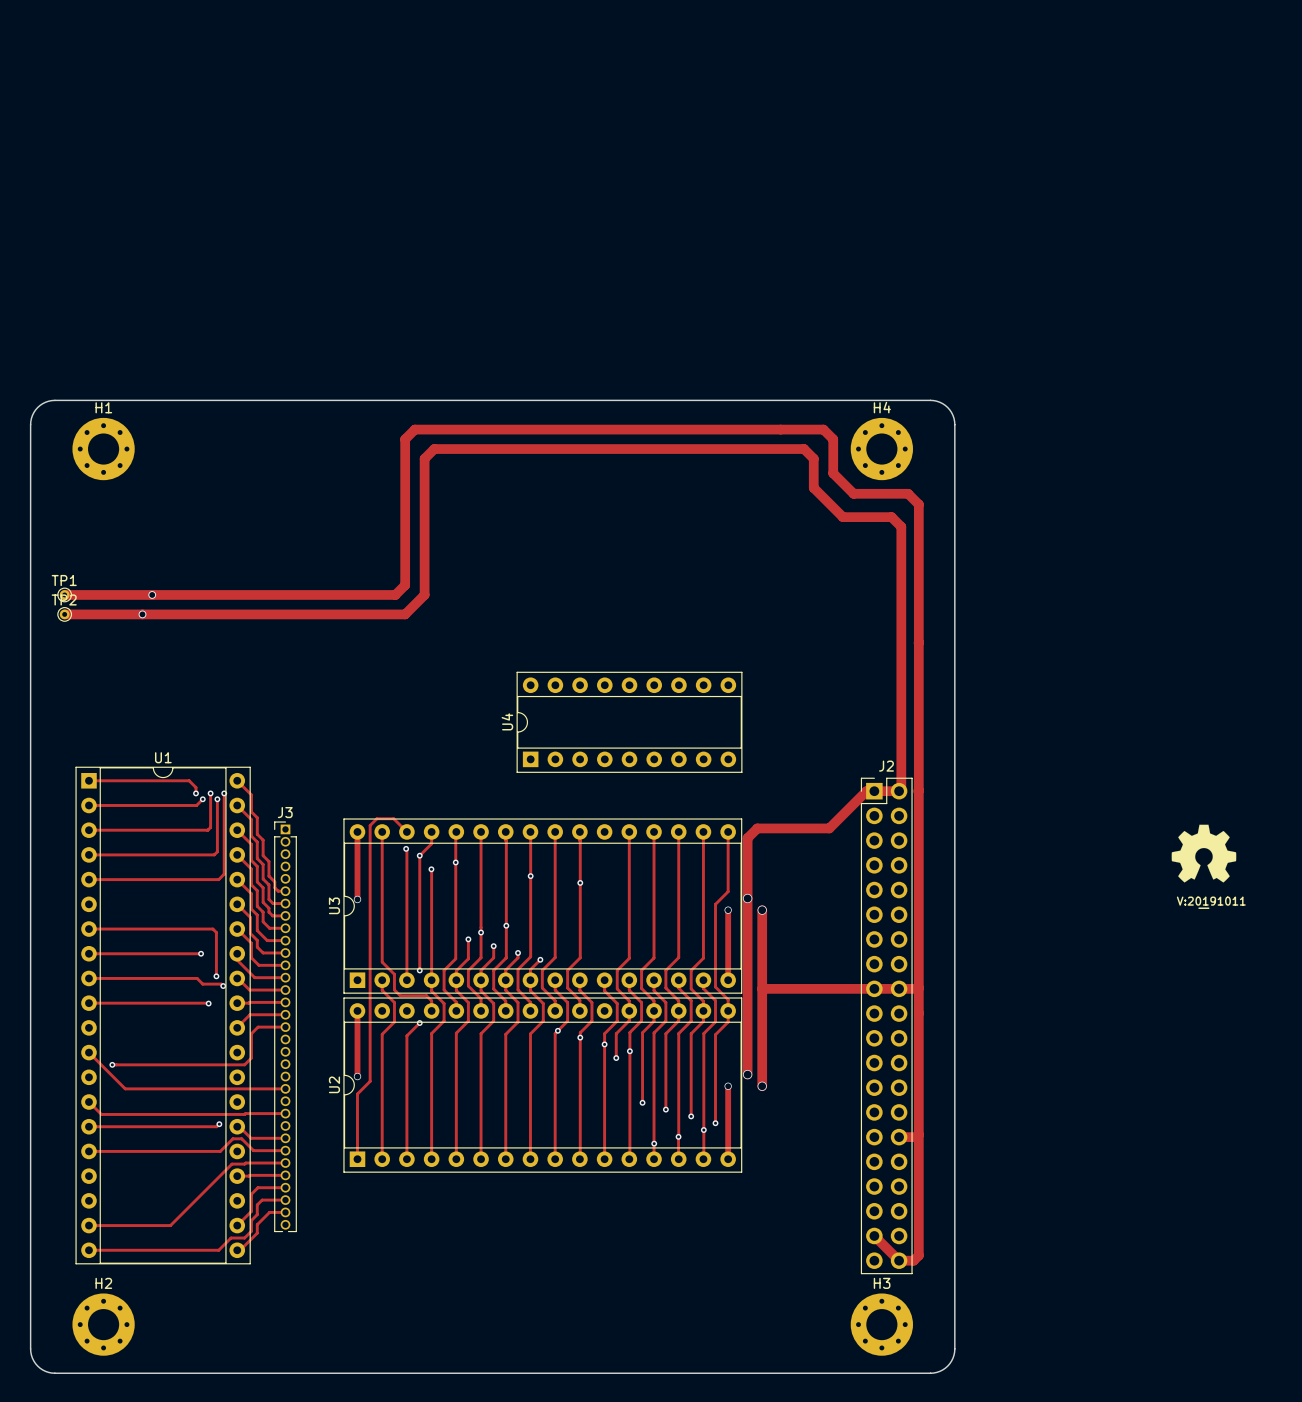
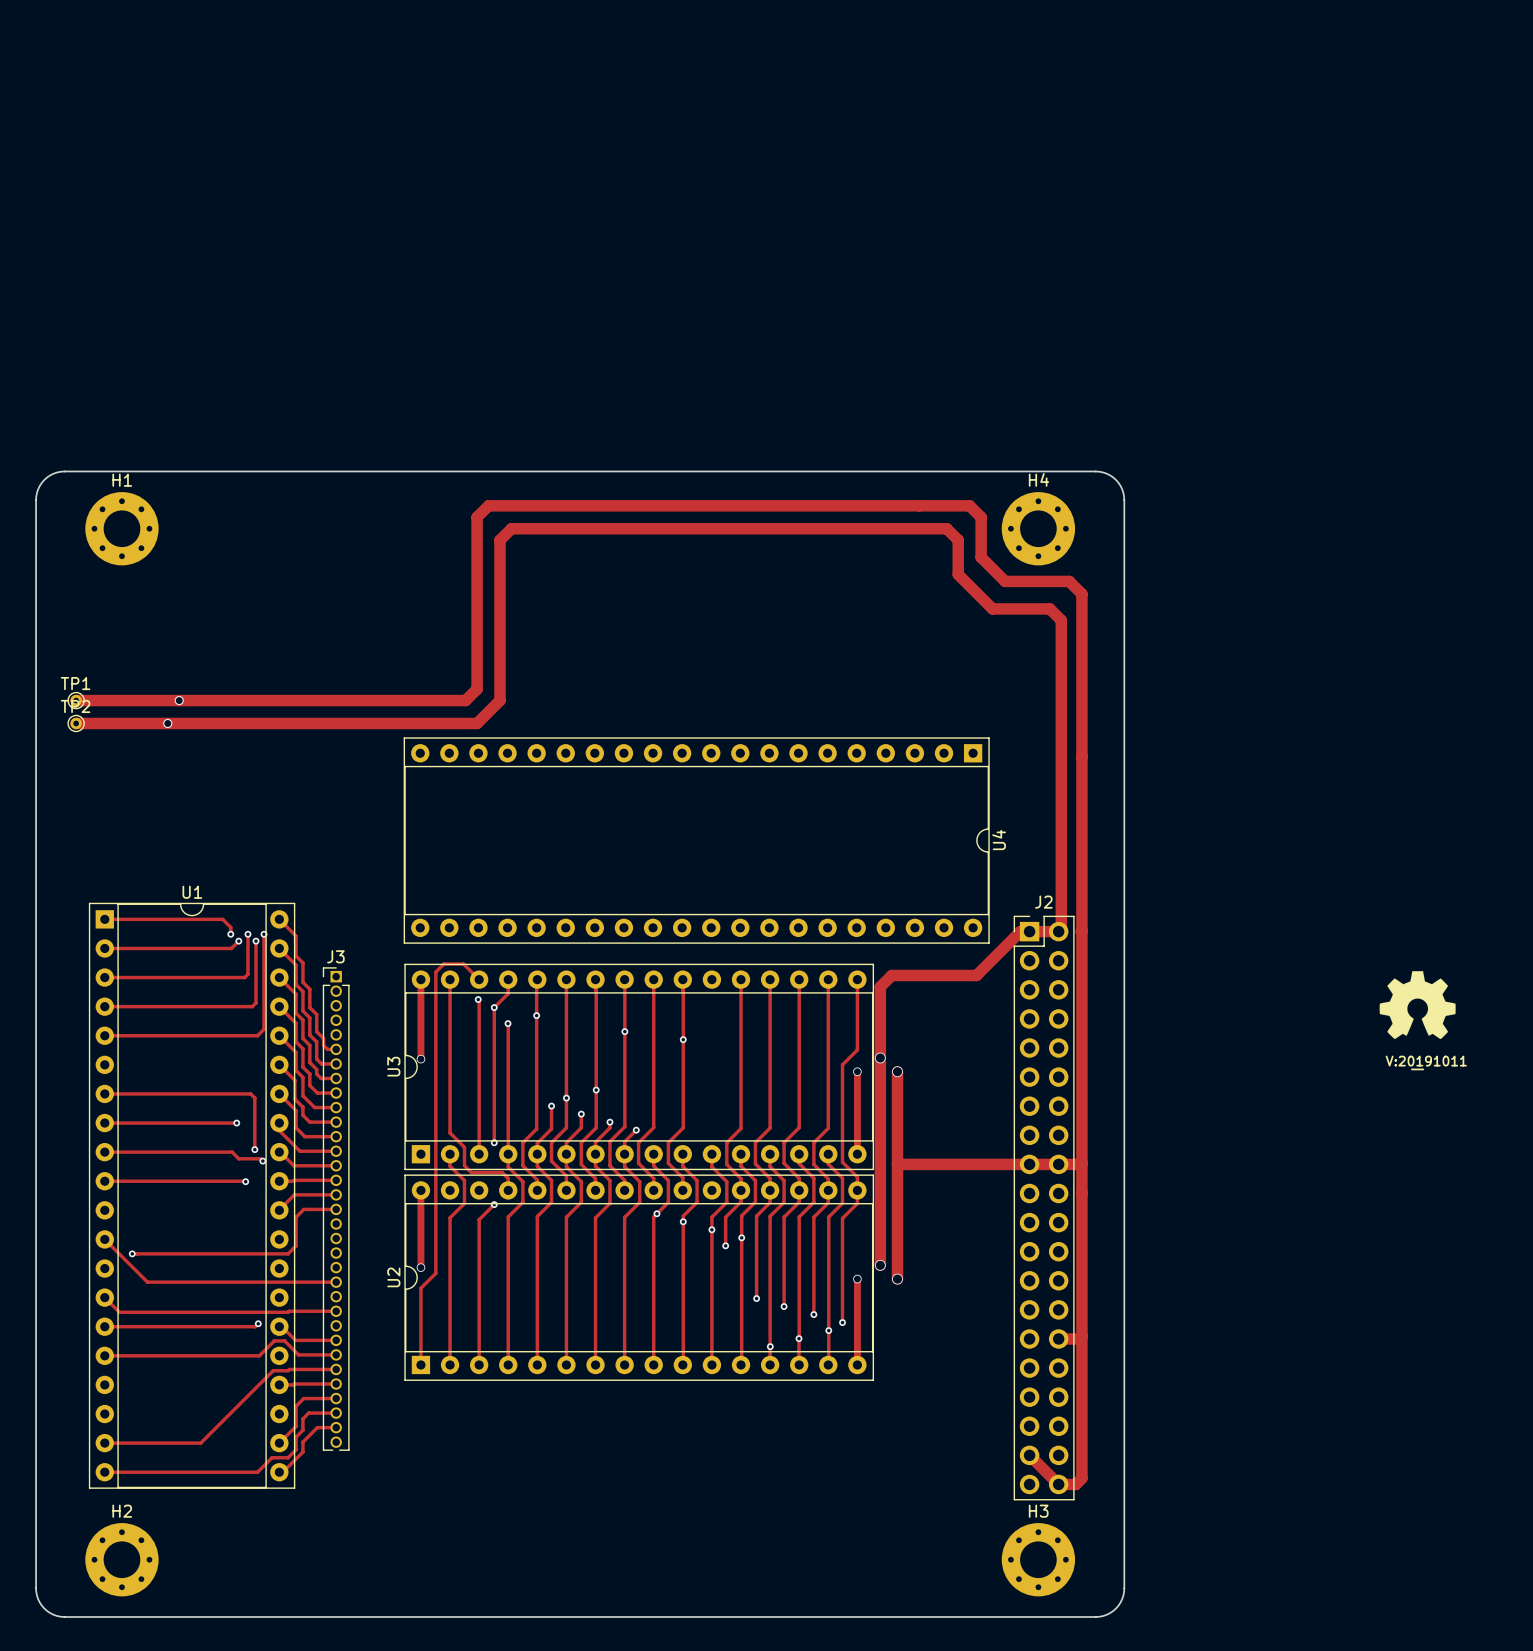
U4 footprint: [516, 671, 743, 773] -> [403, 737, 990, 944]
U4 name position: U4 (507, 721) -> U4 (999, 840)

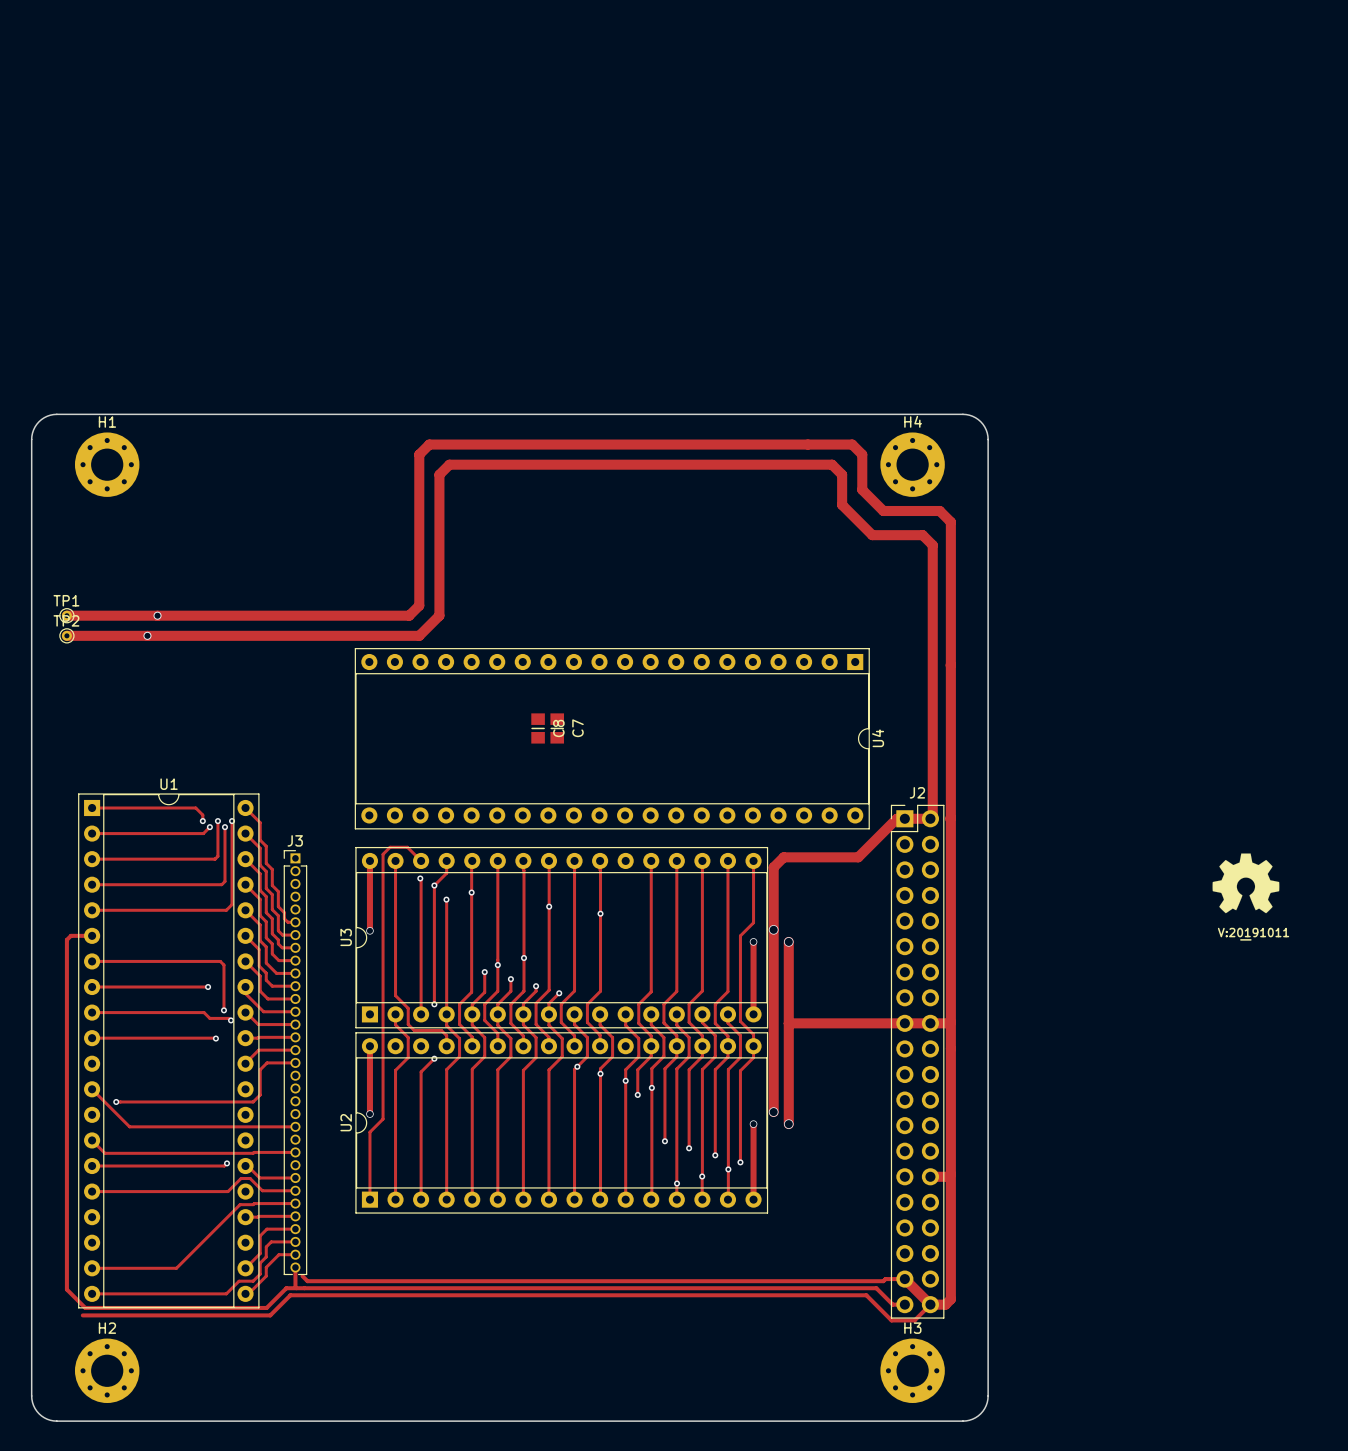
C8: none -> (538, 728)
C7: none -> (557, 728)
track: none -> (92, 935) (70, 935) (66, 939) (66, 1289) (85, 1307) (266, 1307) (286, 1288) (876, 1288) (892, 1304) (904, 1304)
track: none -> (295, 1267) (296, 1288)
track: none -> (302, 1276) (307, 1281) (883, 1281) (885, 1279) (904, 1279)
track: none -> (930, 1304) (914, 1320) (891, 1320) (866, 1295) (290, 1295) (270, 1315) (82, 1315)

